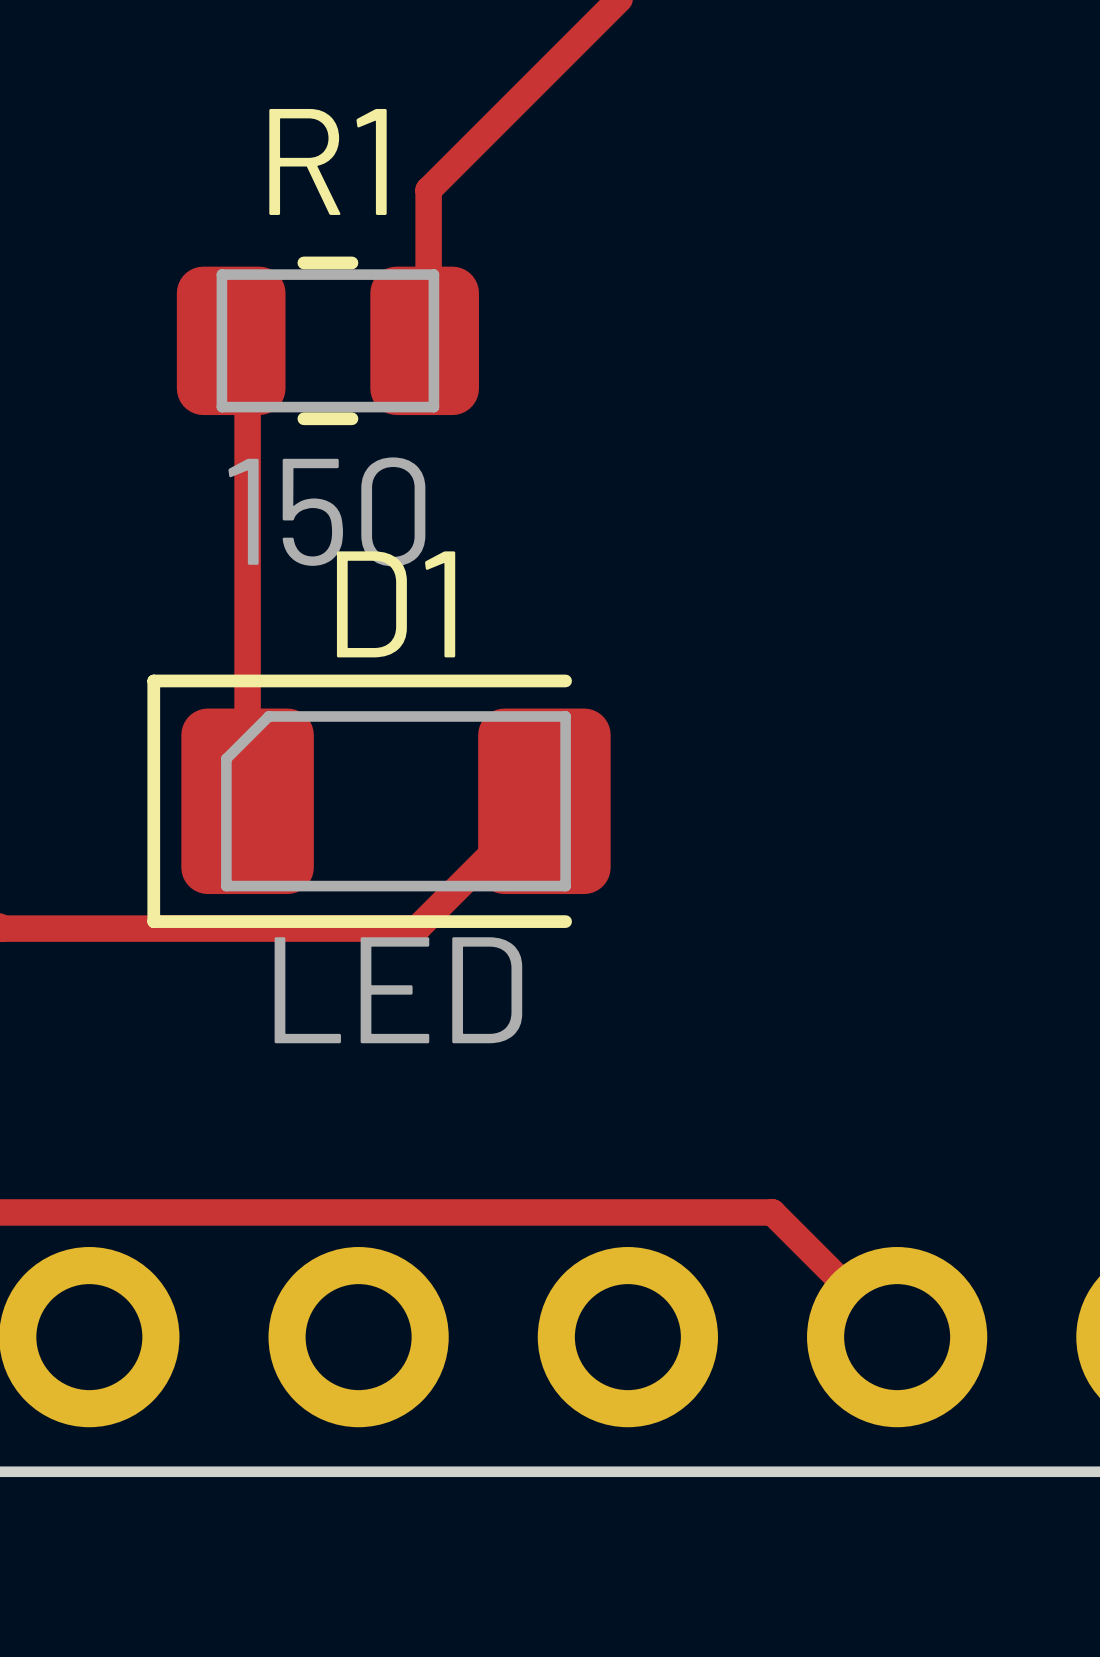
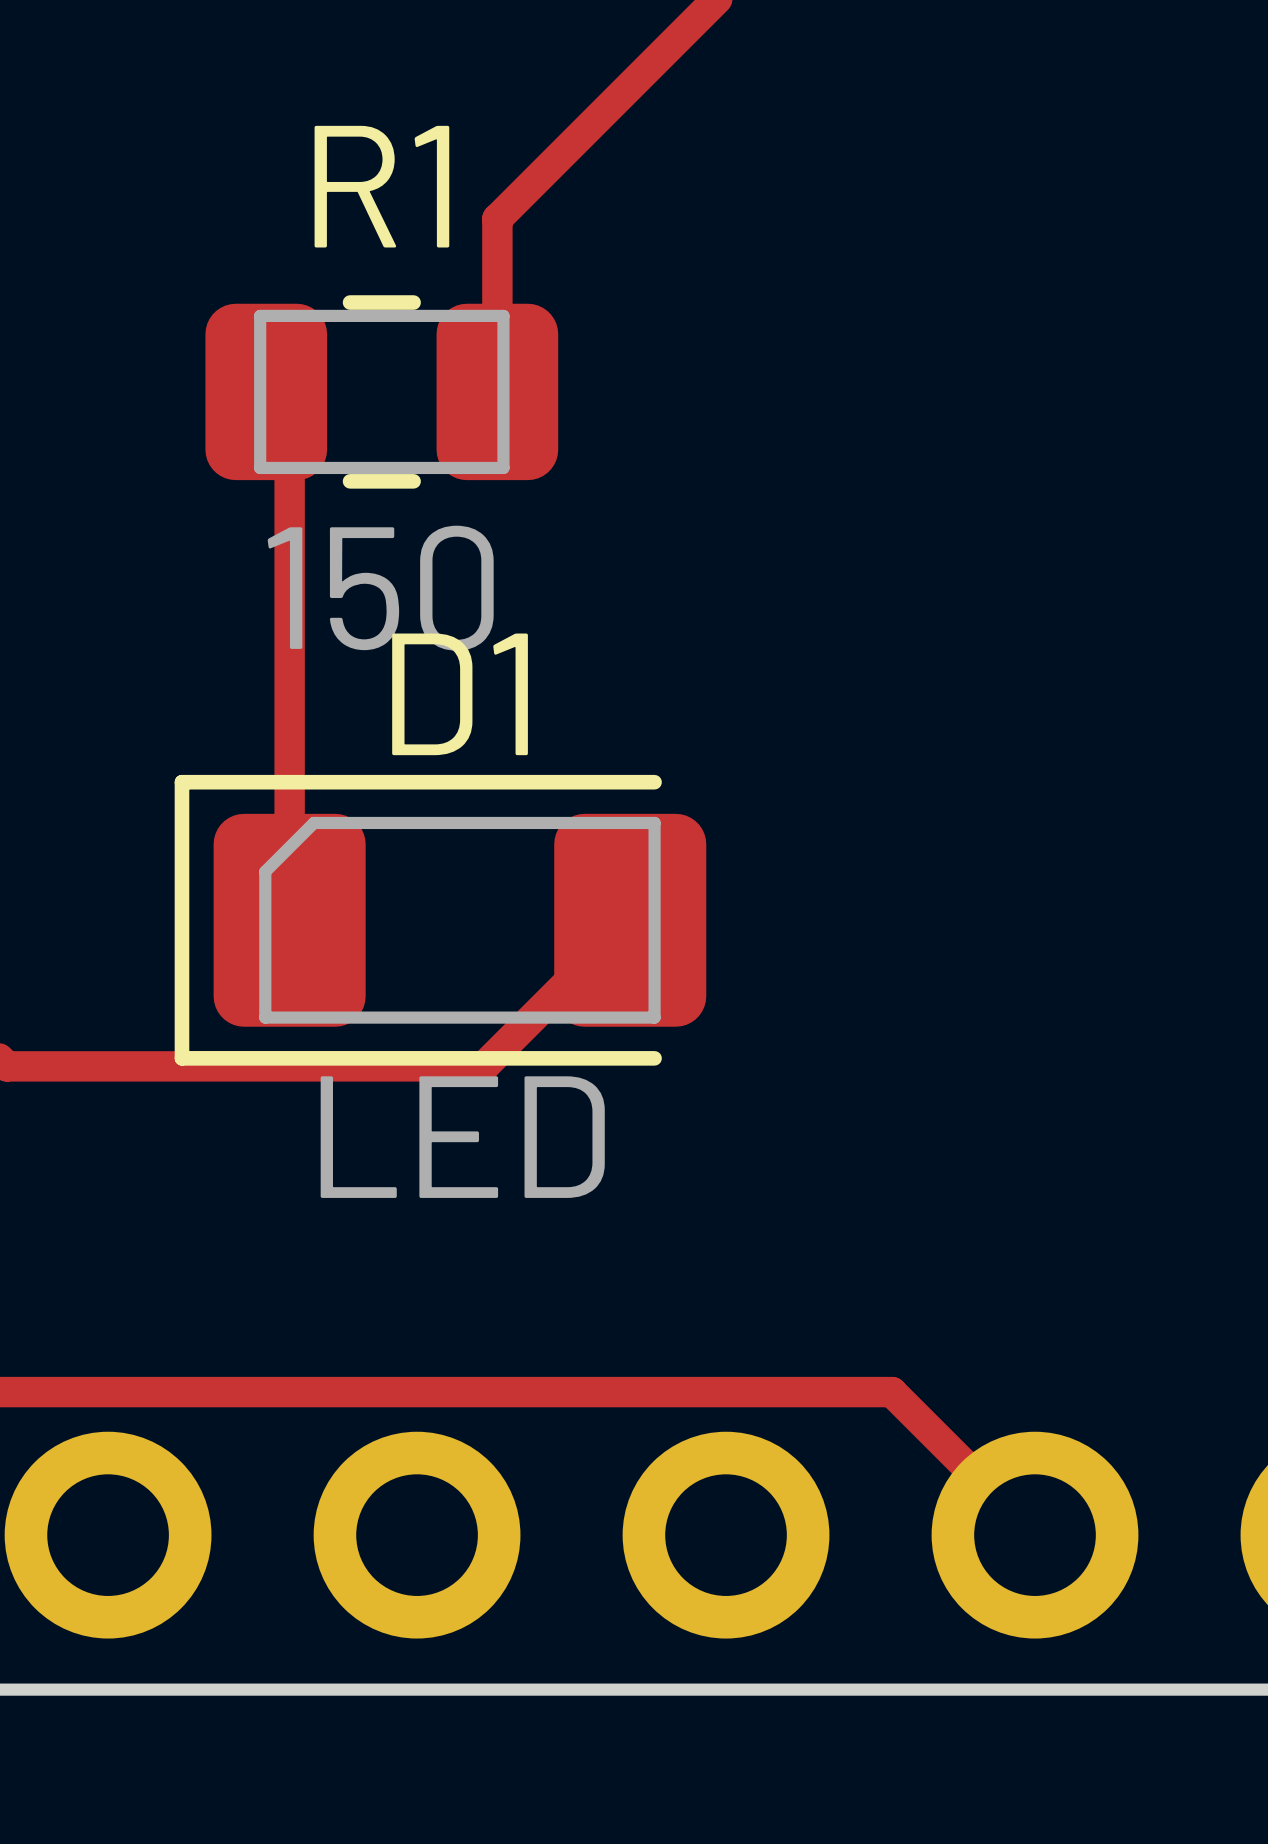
R1 footprint: [176, 256, 479, 426] -> [205, 295, 559, 489]

